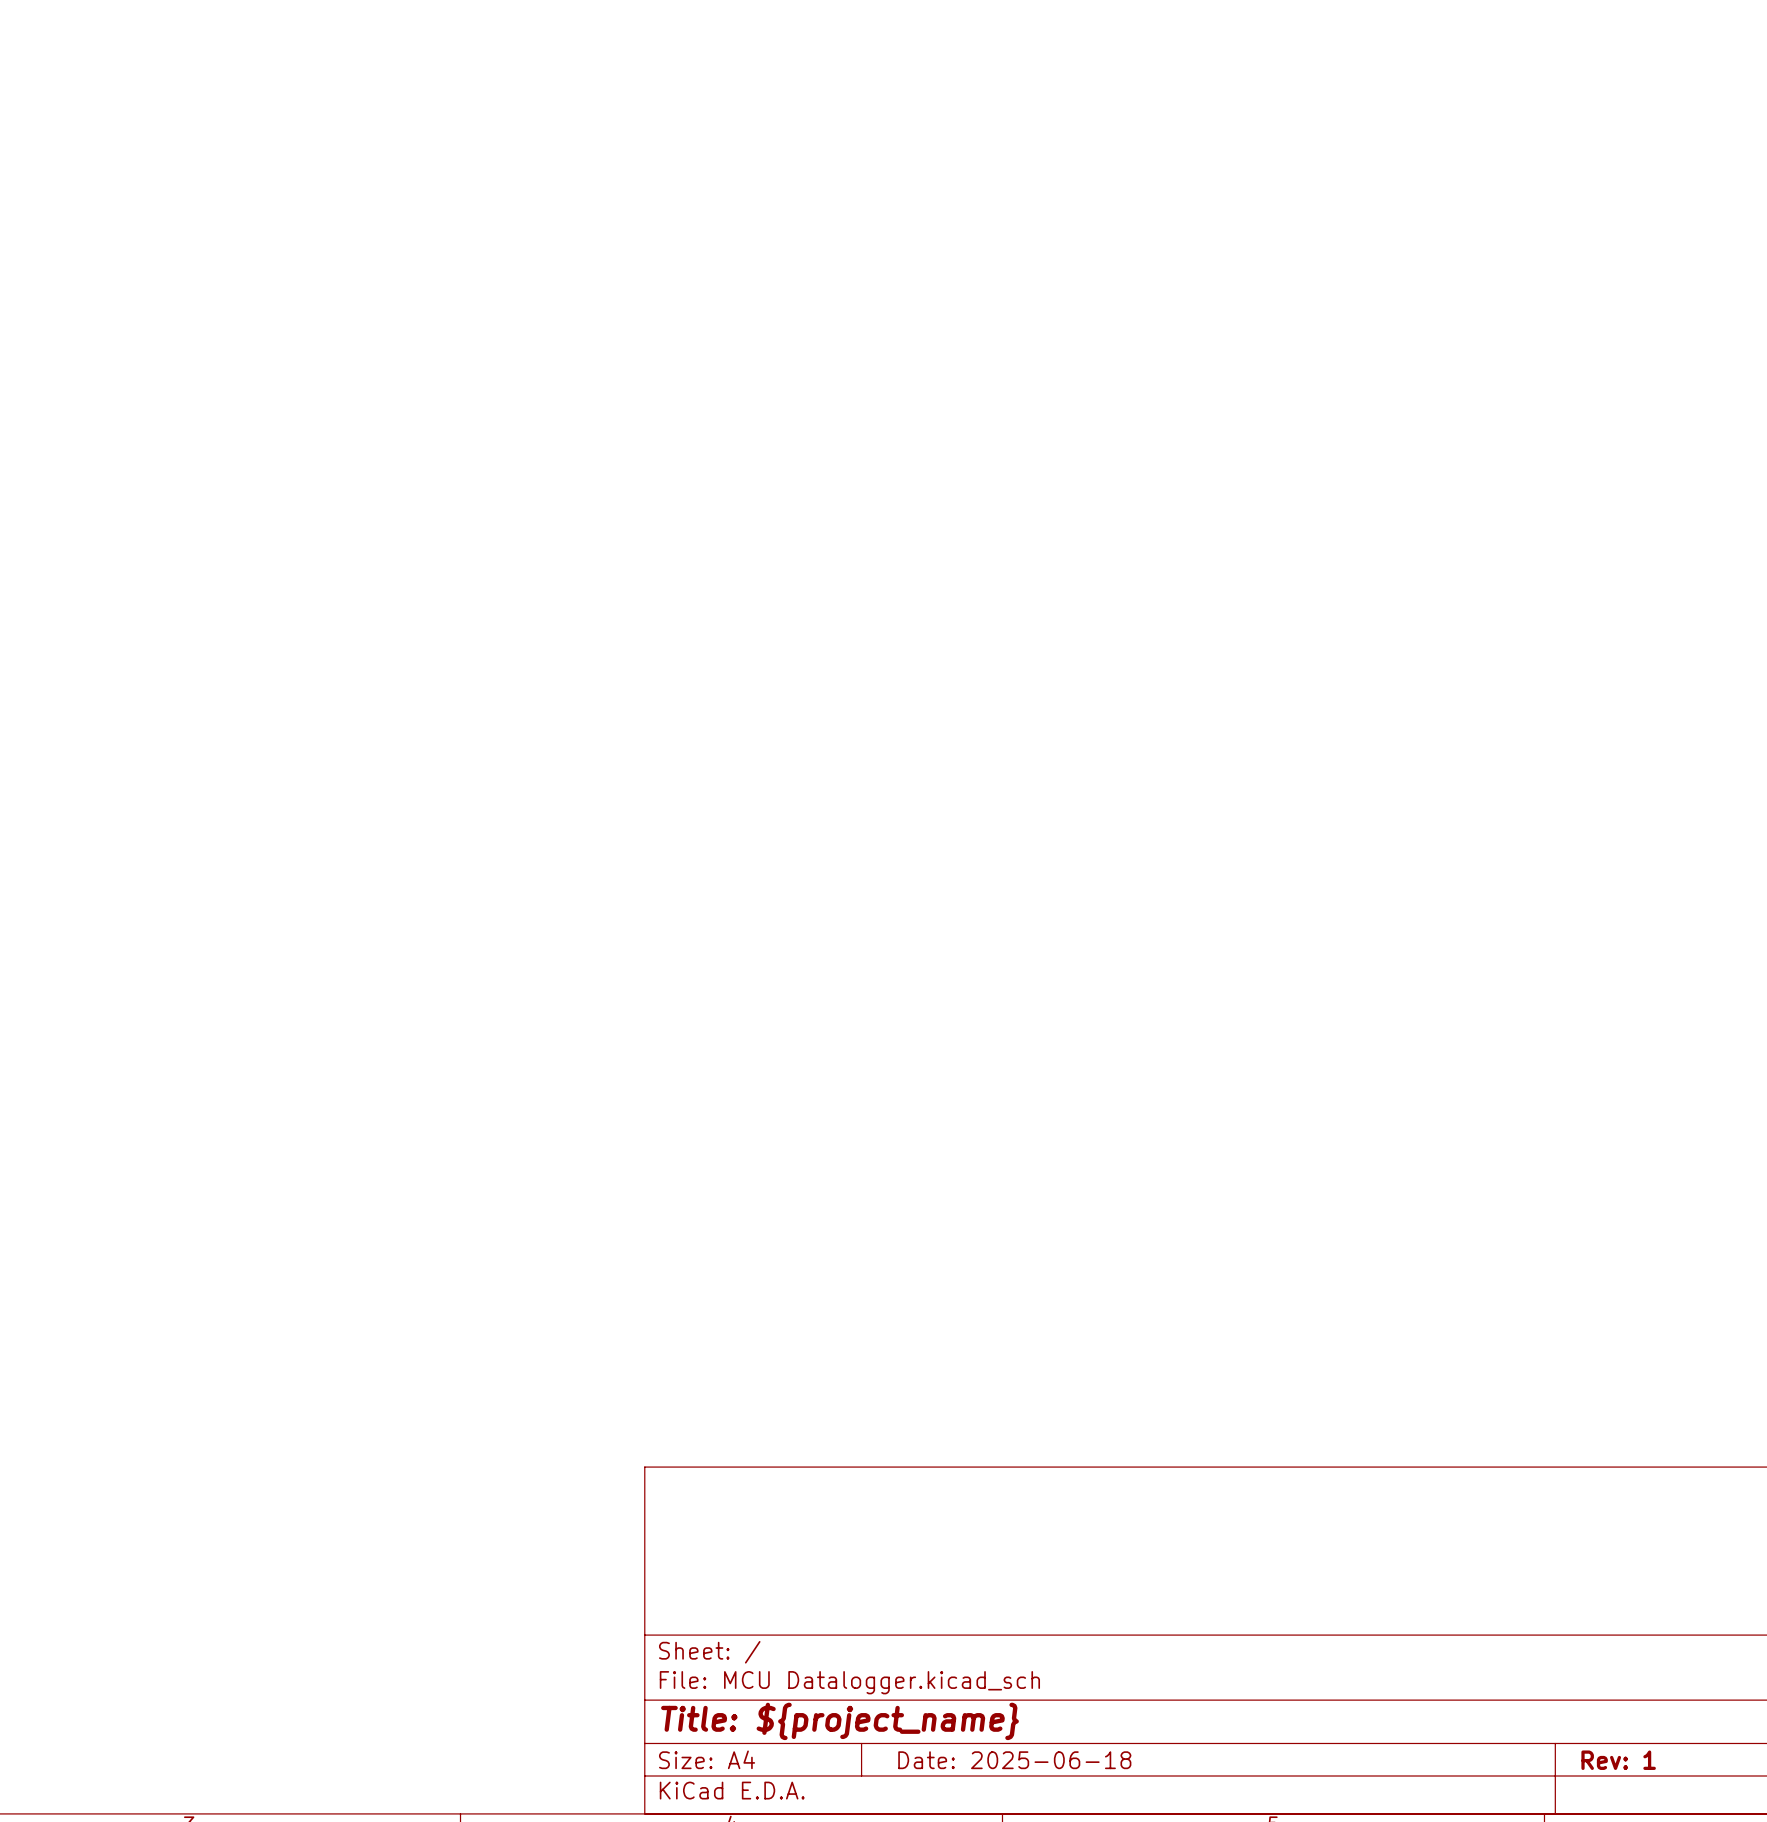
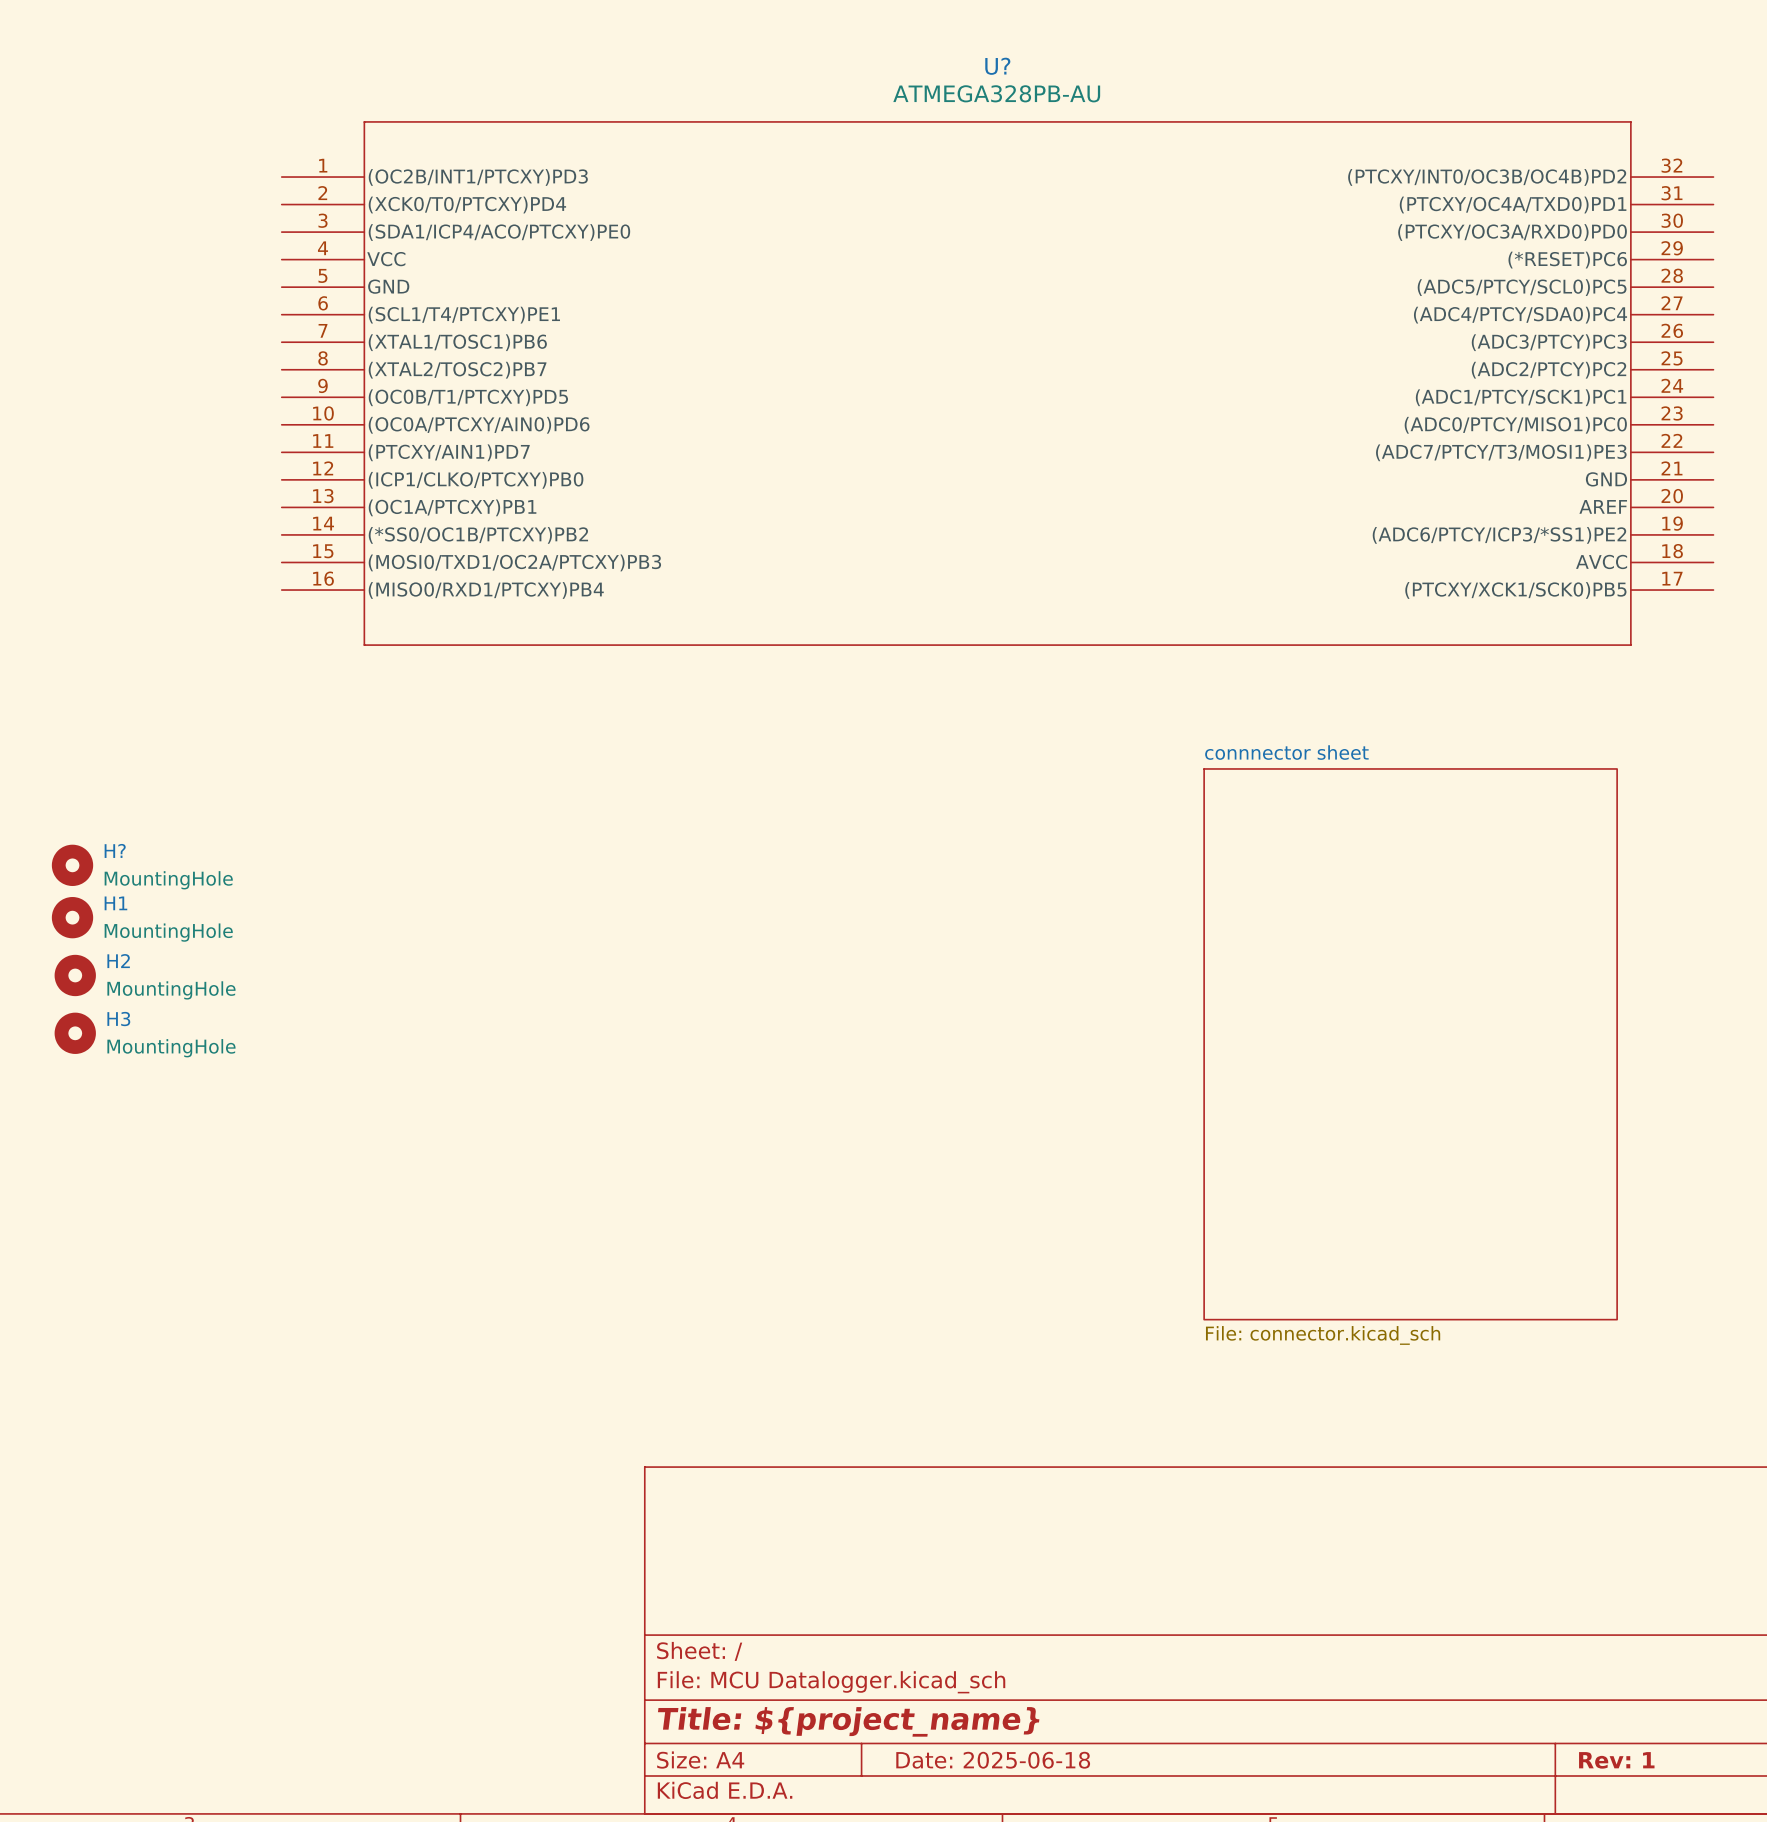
U?: none -> ATMEGA328PB-AU (997, 383)
H?: none -> MountingHole (72, 865)
H1: none -> MountingHole (72, 917)
H2: none -> MountingHole (75, 975)
H3: none -> MountingHole (75, 1033)
sheet connnector sheet: none -> File: connector.kicad_sch (1410, 1044)

